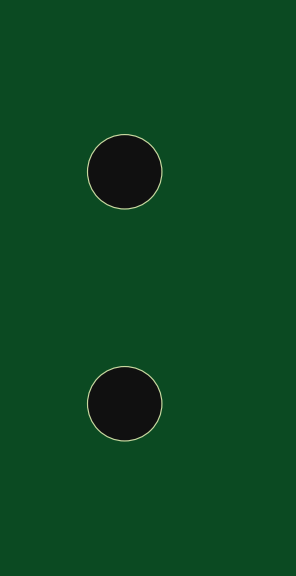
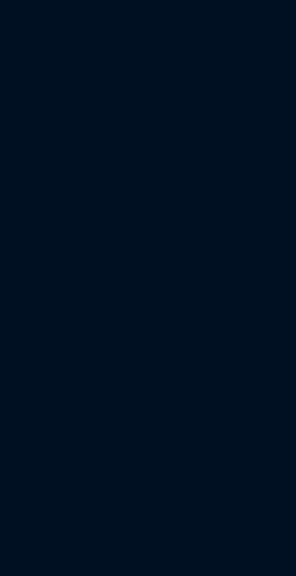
part: (124, 171) -> none
part: (124, 403) -> none

